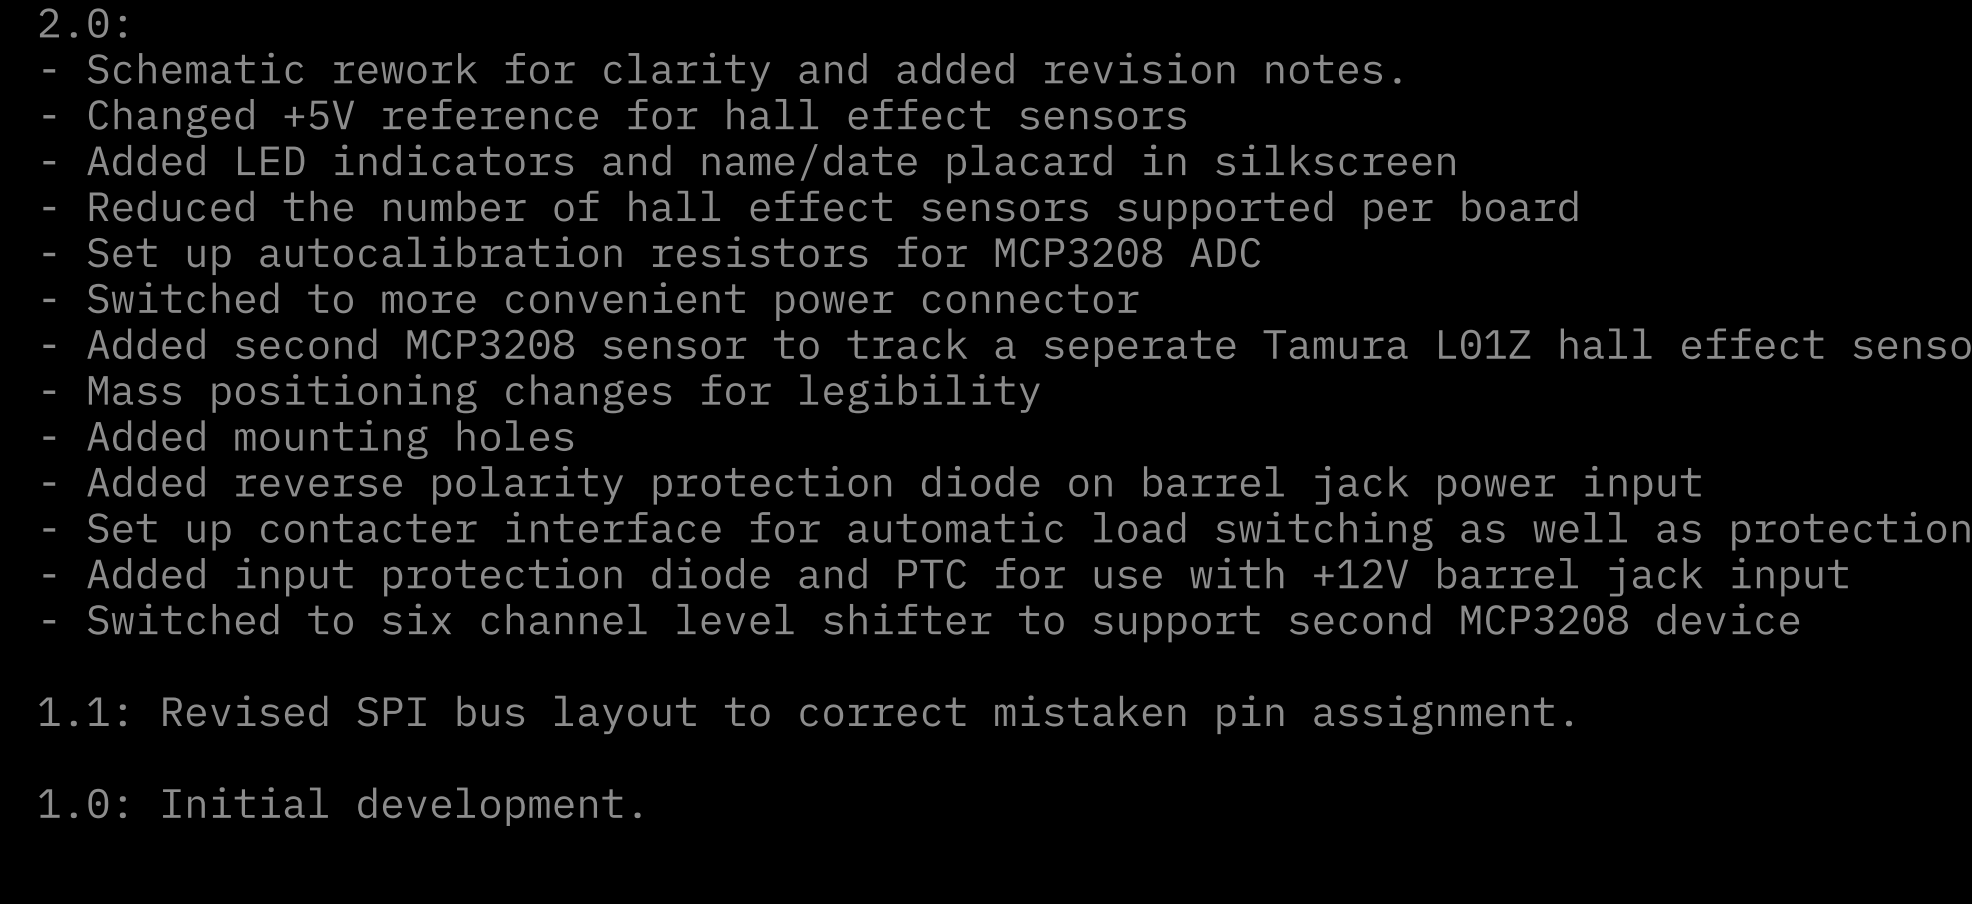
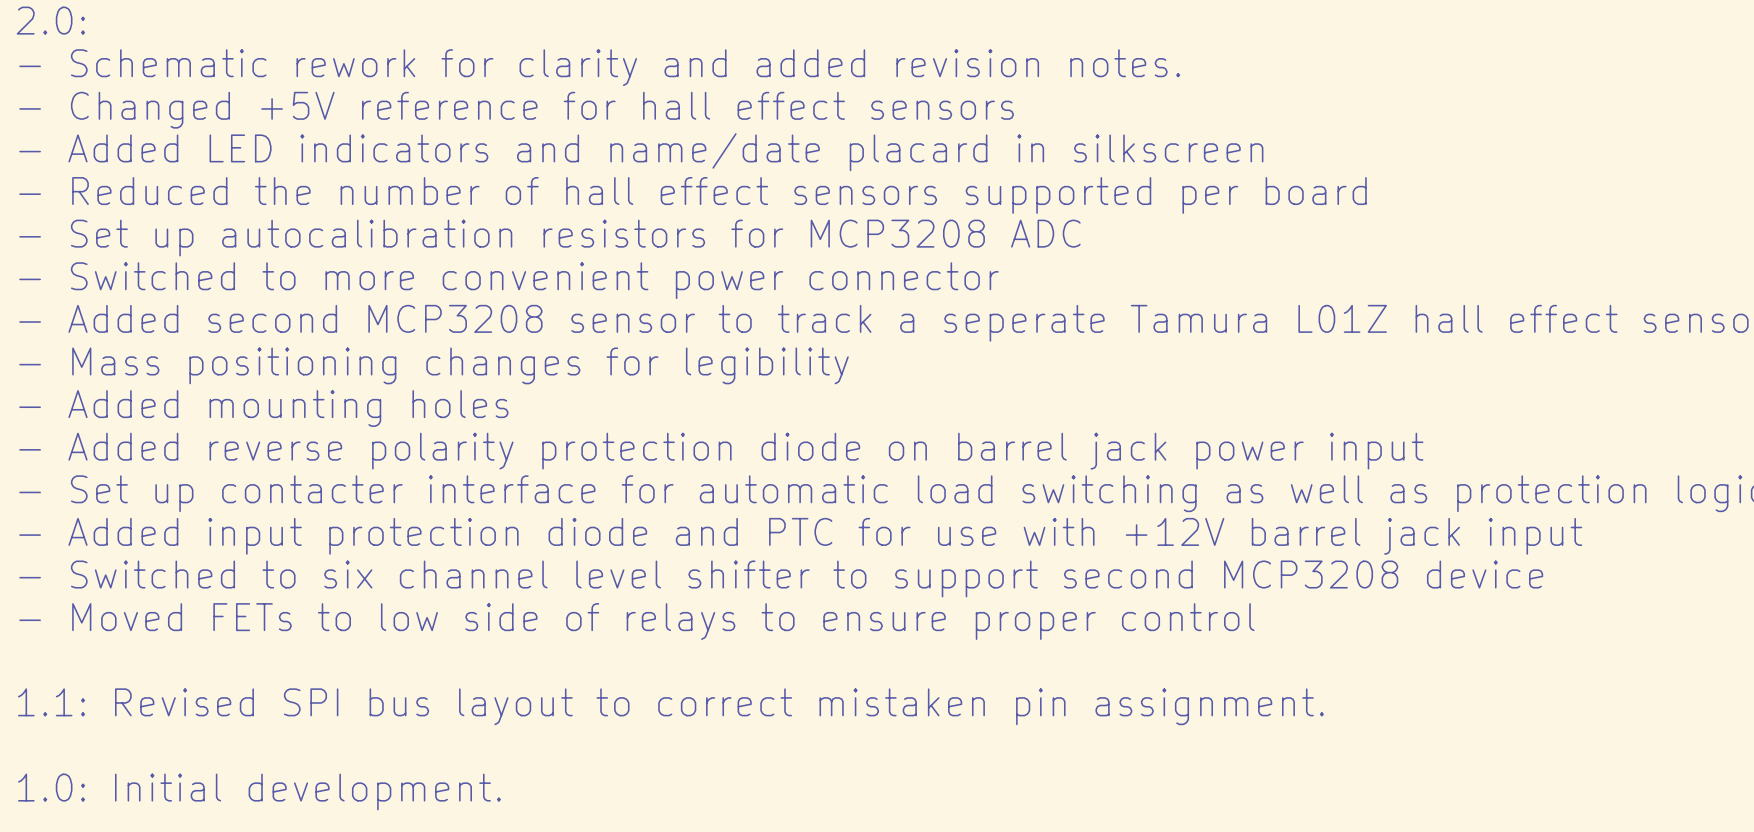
text: none -> - Moved FETs to low side of relays to ensure proper control (636, 621)
text position: 1.1: Revised SPI bus layout to correct mistaken pin assignment. (805, 715) -> 1.1: Revised SPI bus layout to correct mistaken pin assignment. (670, 706)
text position: 1.0: Initial development. (339, 806) -> 1.0: Initial development. (259, 791)

